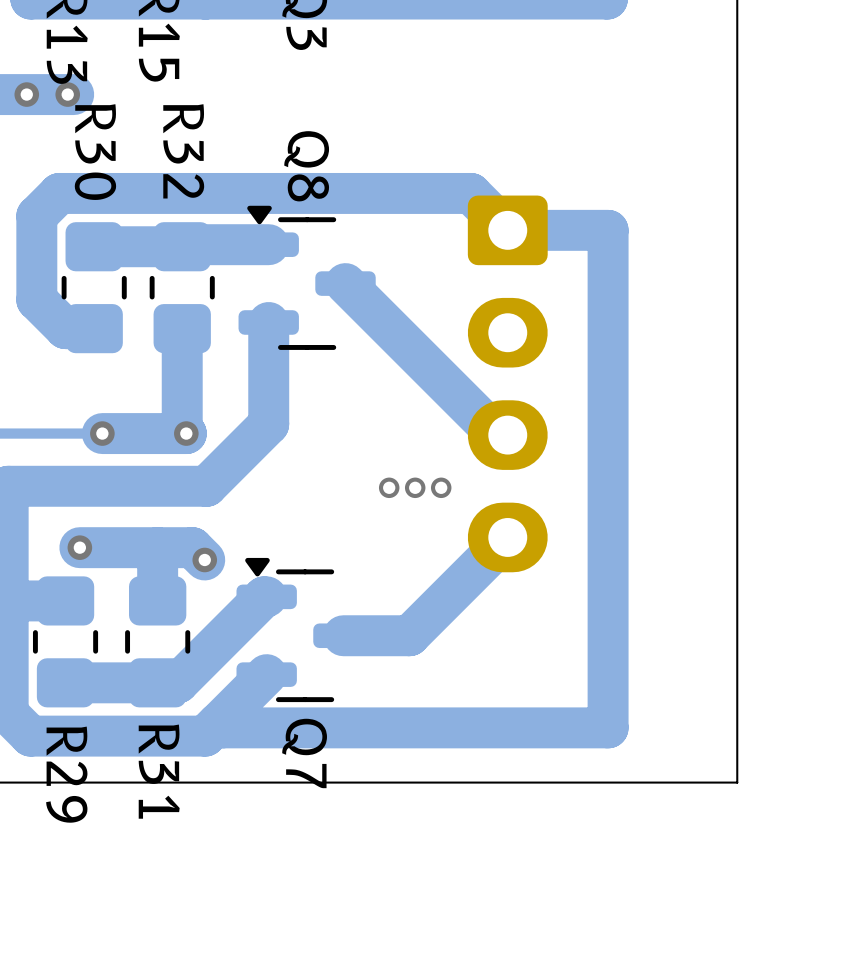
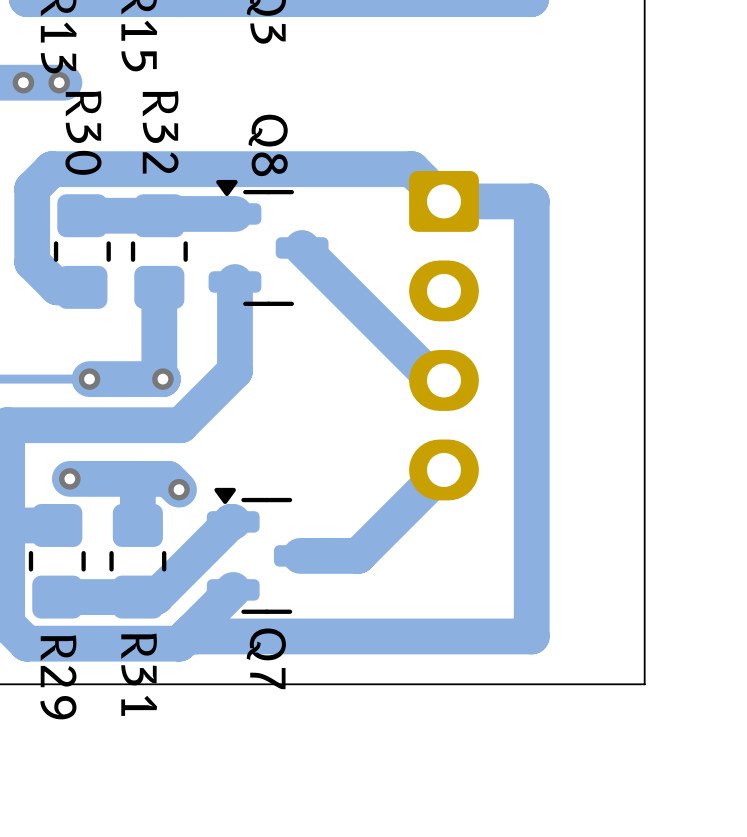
via: (389, 487) -> none
via: (415, 487) -> none
via: (441, 487) -> none

